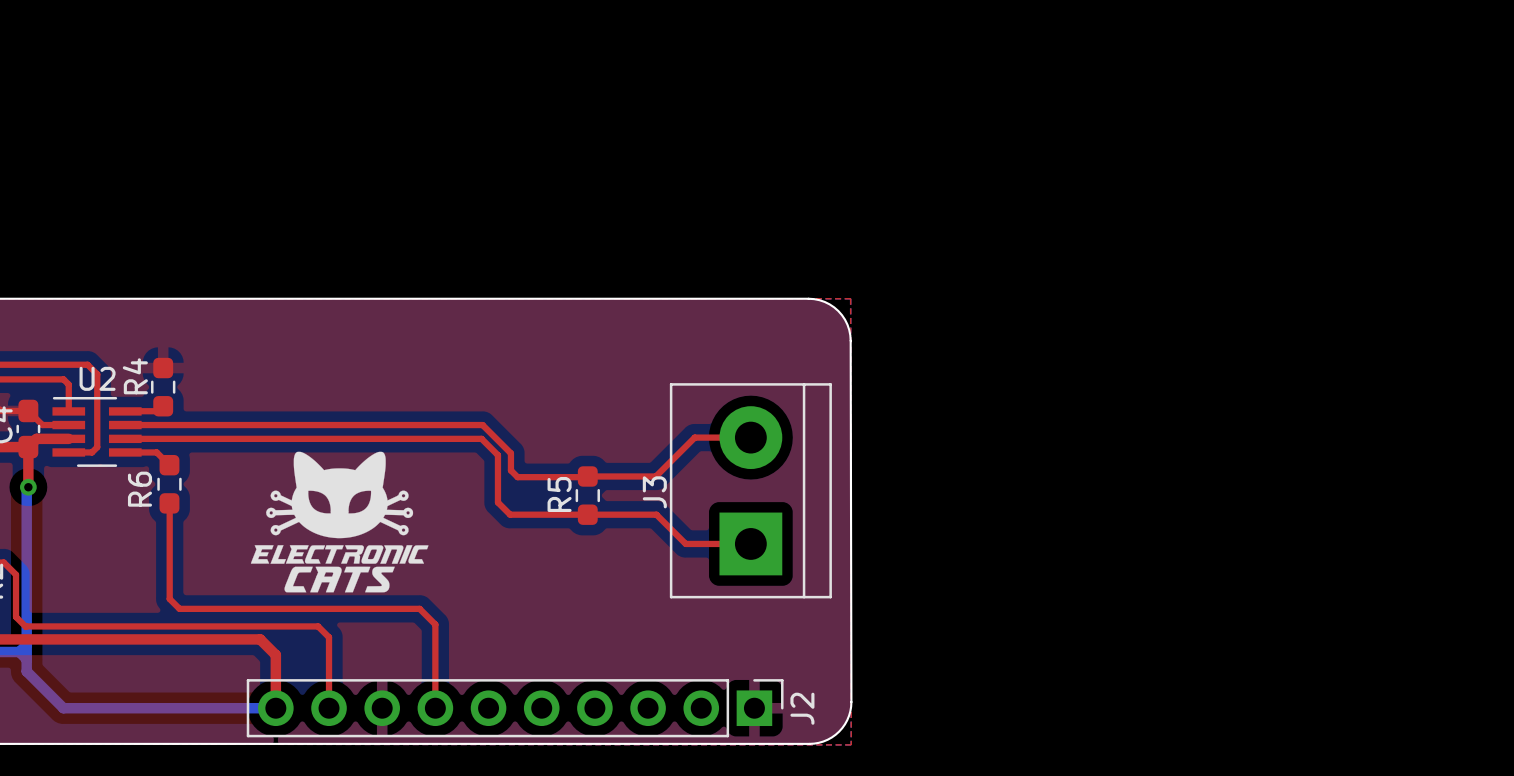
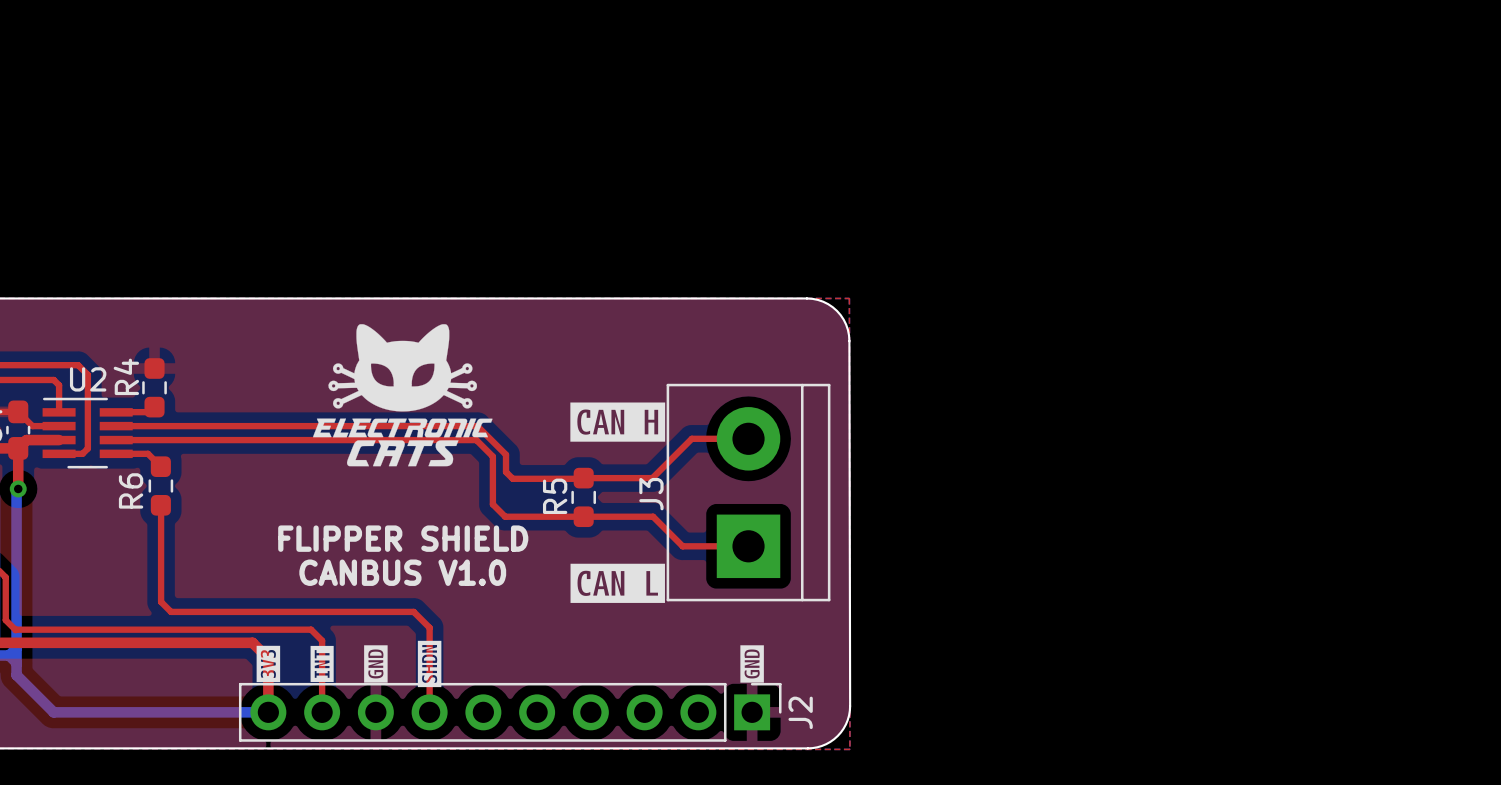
drawing: none -> [570, 402, 666, 442]
drawing position: (339, 522) -> (402, 395)
text: none -> FLIPPER SHIELD (403, 538)
drawing: none -> [570, 563, 665, 603]
text: none -> CANBUS V1.0 (402, 572)
drawing: none -> [417, 640, 442, 688]
drawing: none -> [364, 645, 388, 683]
drawing: none -> [740, 645, 764, 683]
drawing: none -> [256, 645, 281, 683]
drawing: none -> [310, 645, 334, 683]

